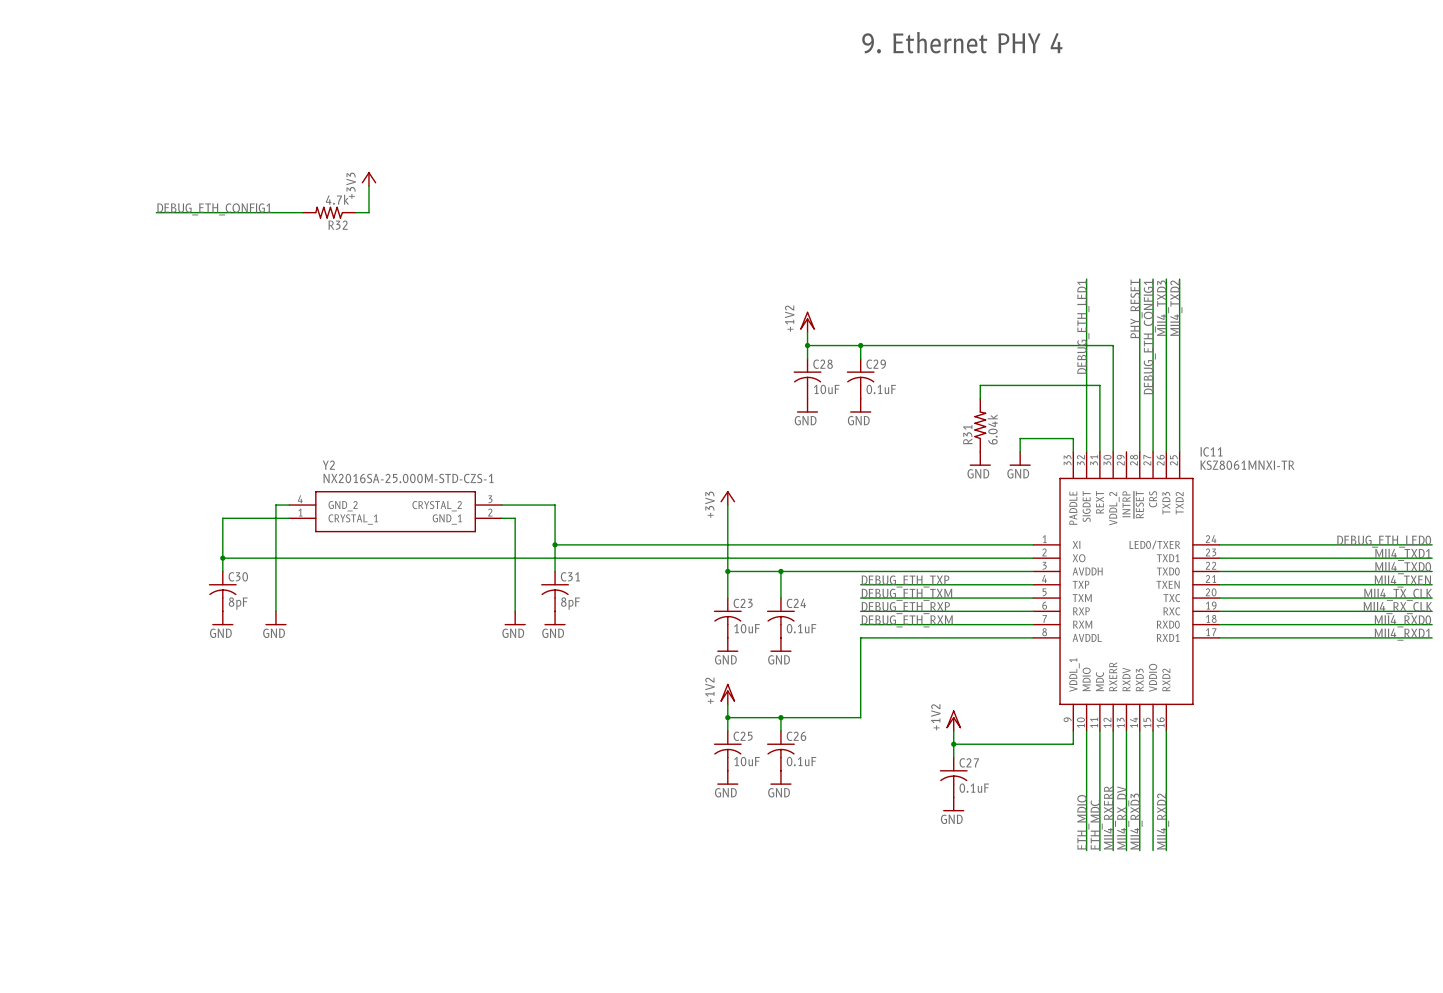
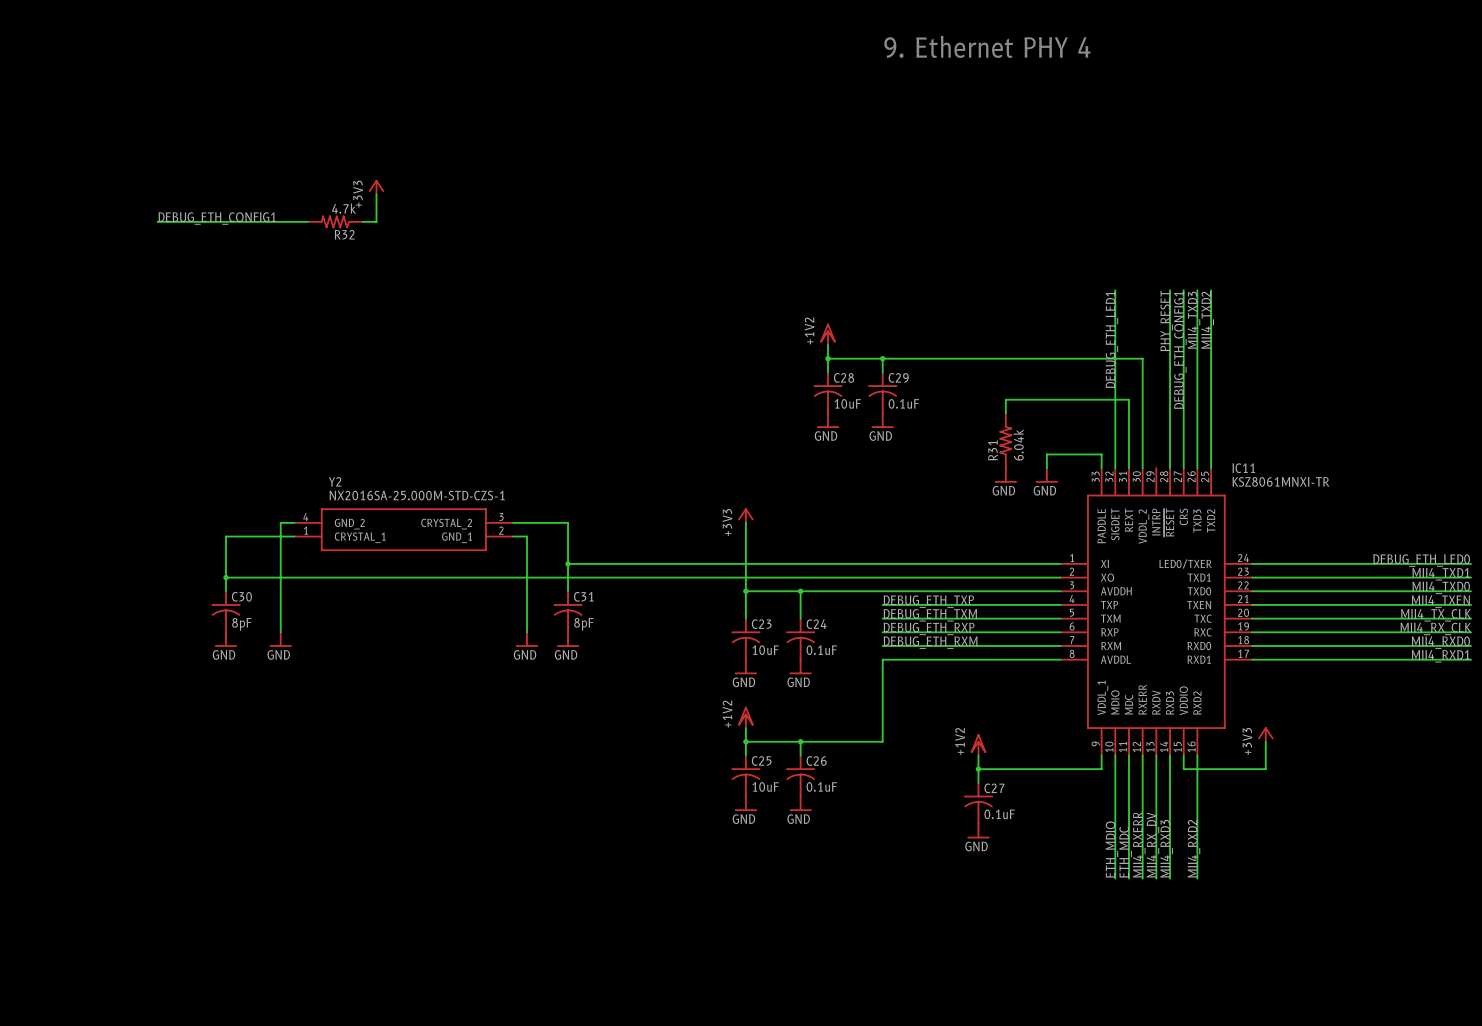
power symbol: none -> +3V3 (1265, 734)
wire: (1153, 744) (1153, 850) -> (1183, 769) (1265, 769) (1265, 741)

